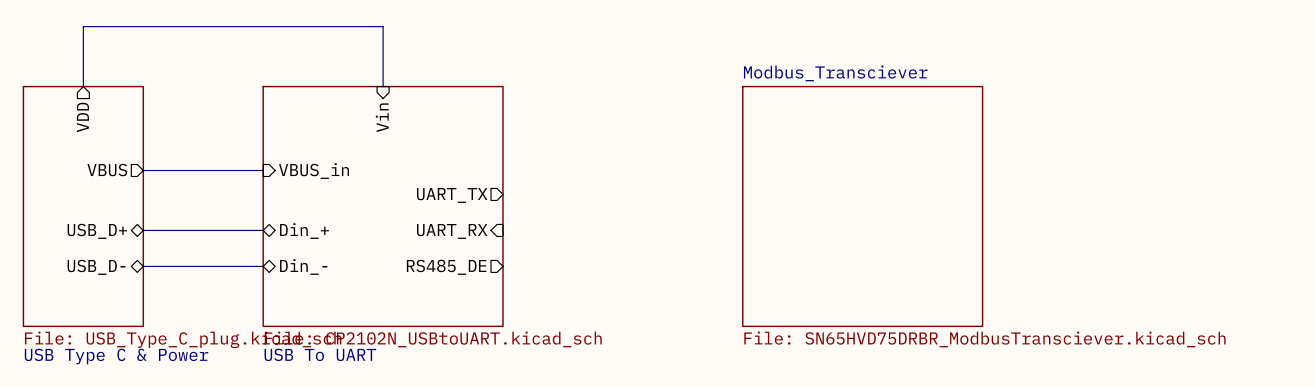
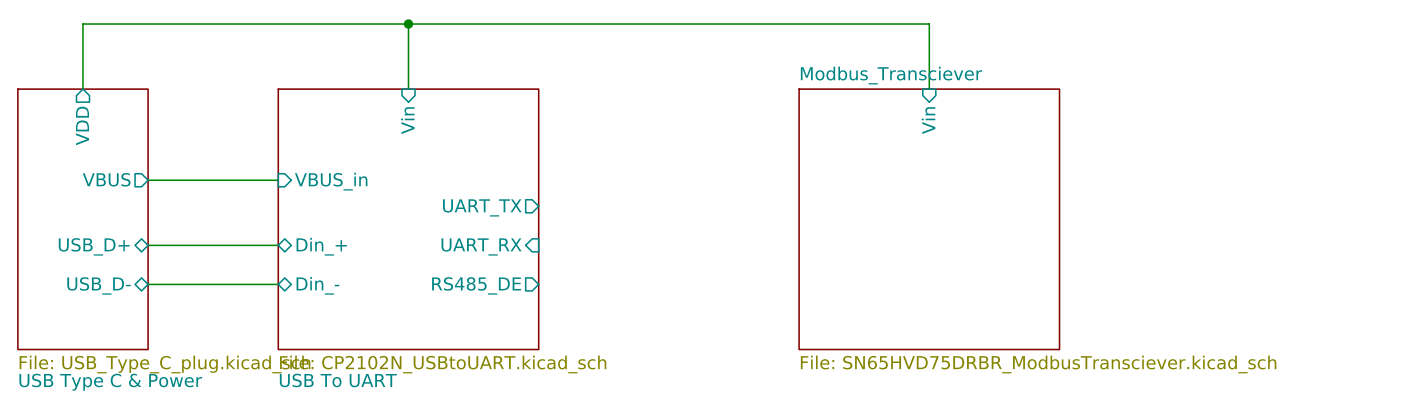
wire: none -> (408, 24) (929, 24) (929, 89)
junction: none -> (408, 24)
sheet pin: none -> Vin (928, 120)

